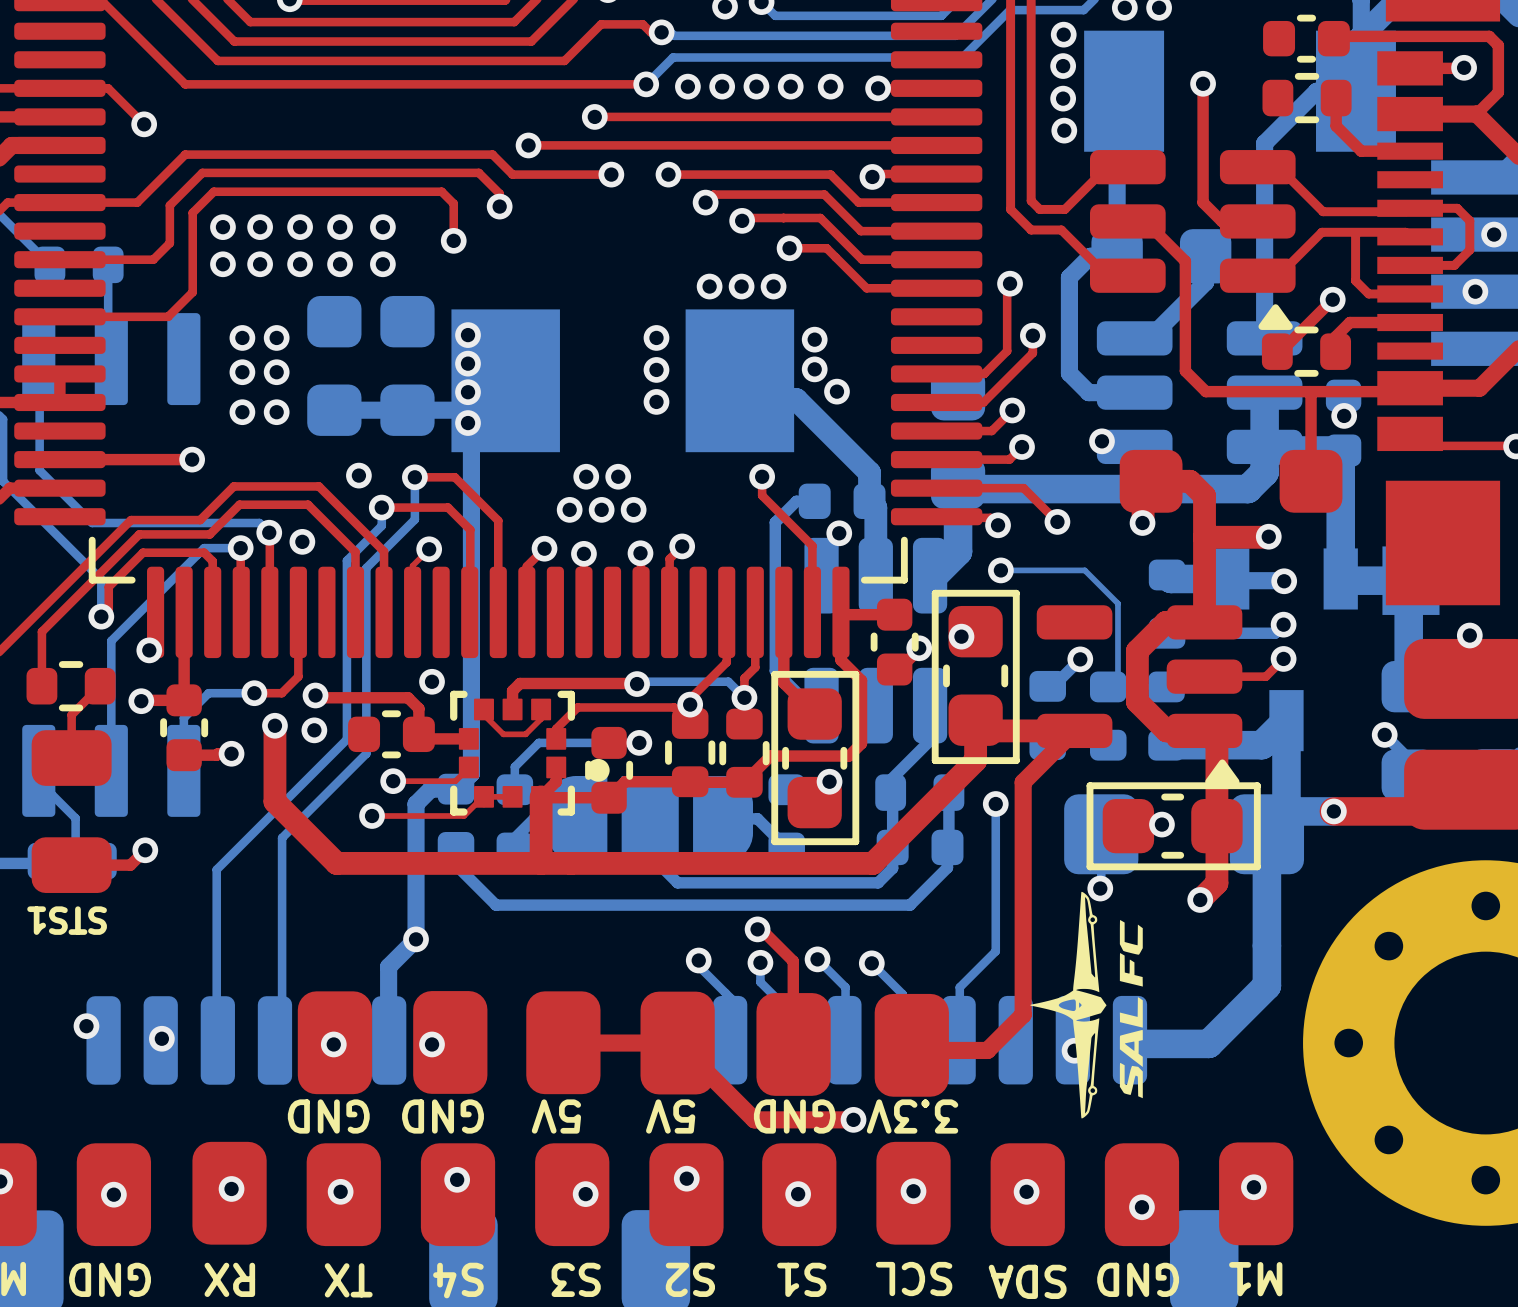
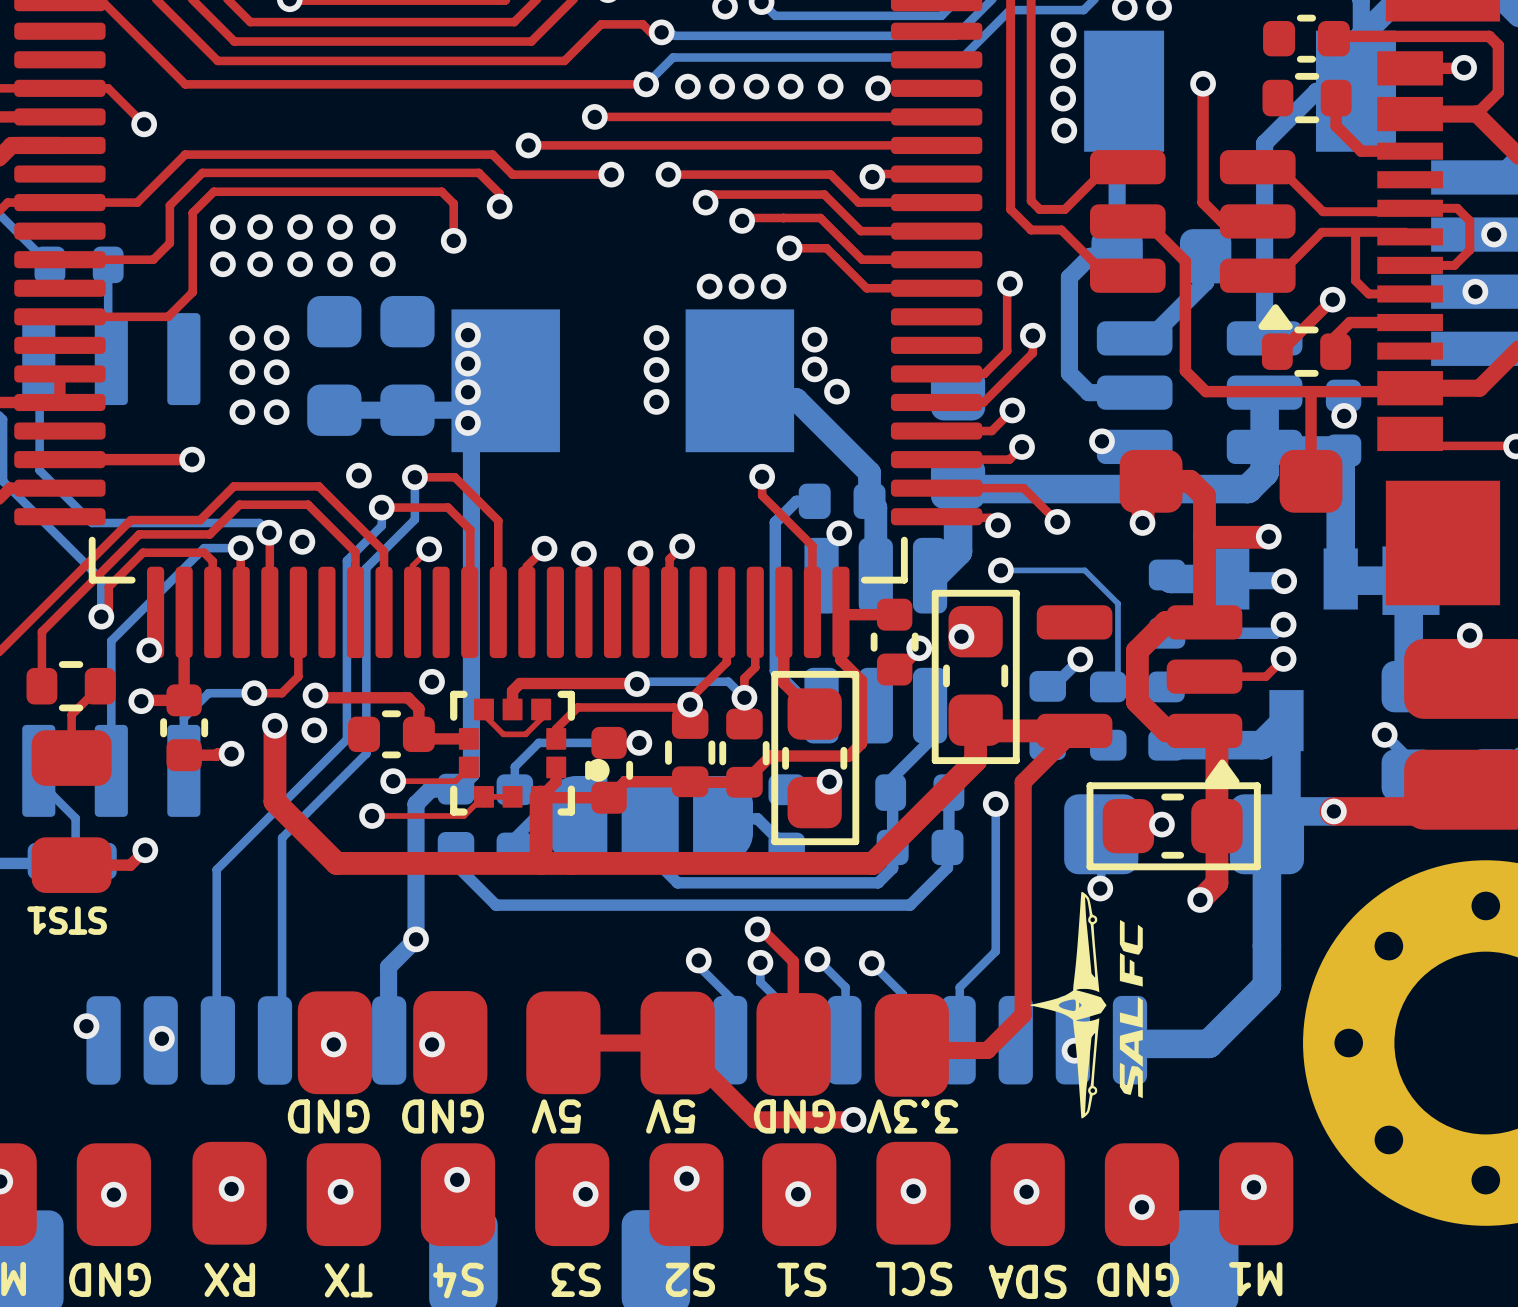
via: (586, 476) -> none
via: (618, 476) -> none
via: (569, 509) -> none
via: (601, 509) -> none
via: (633, 509) -> none

